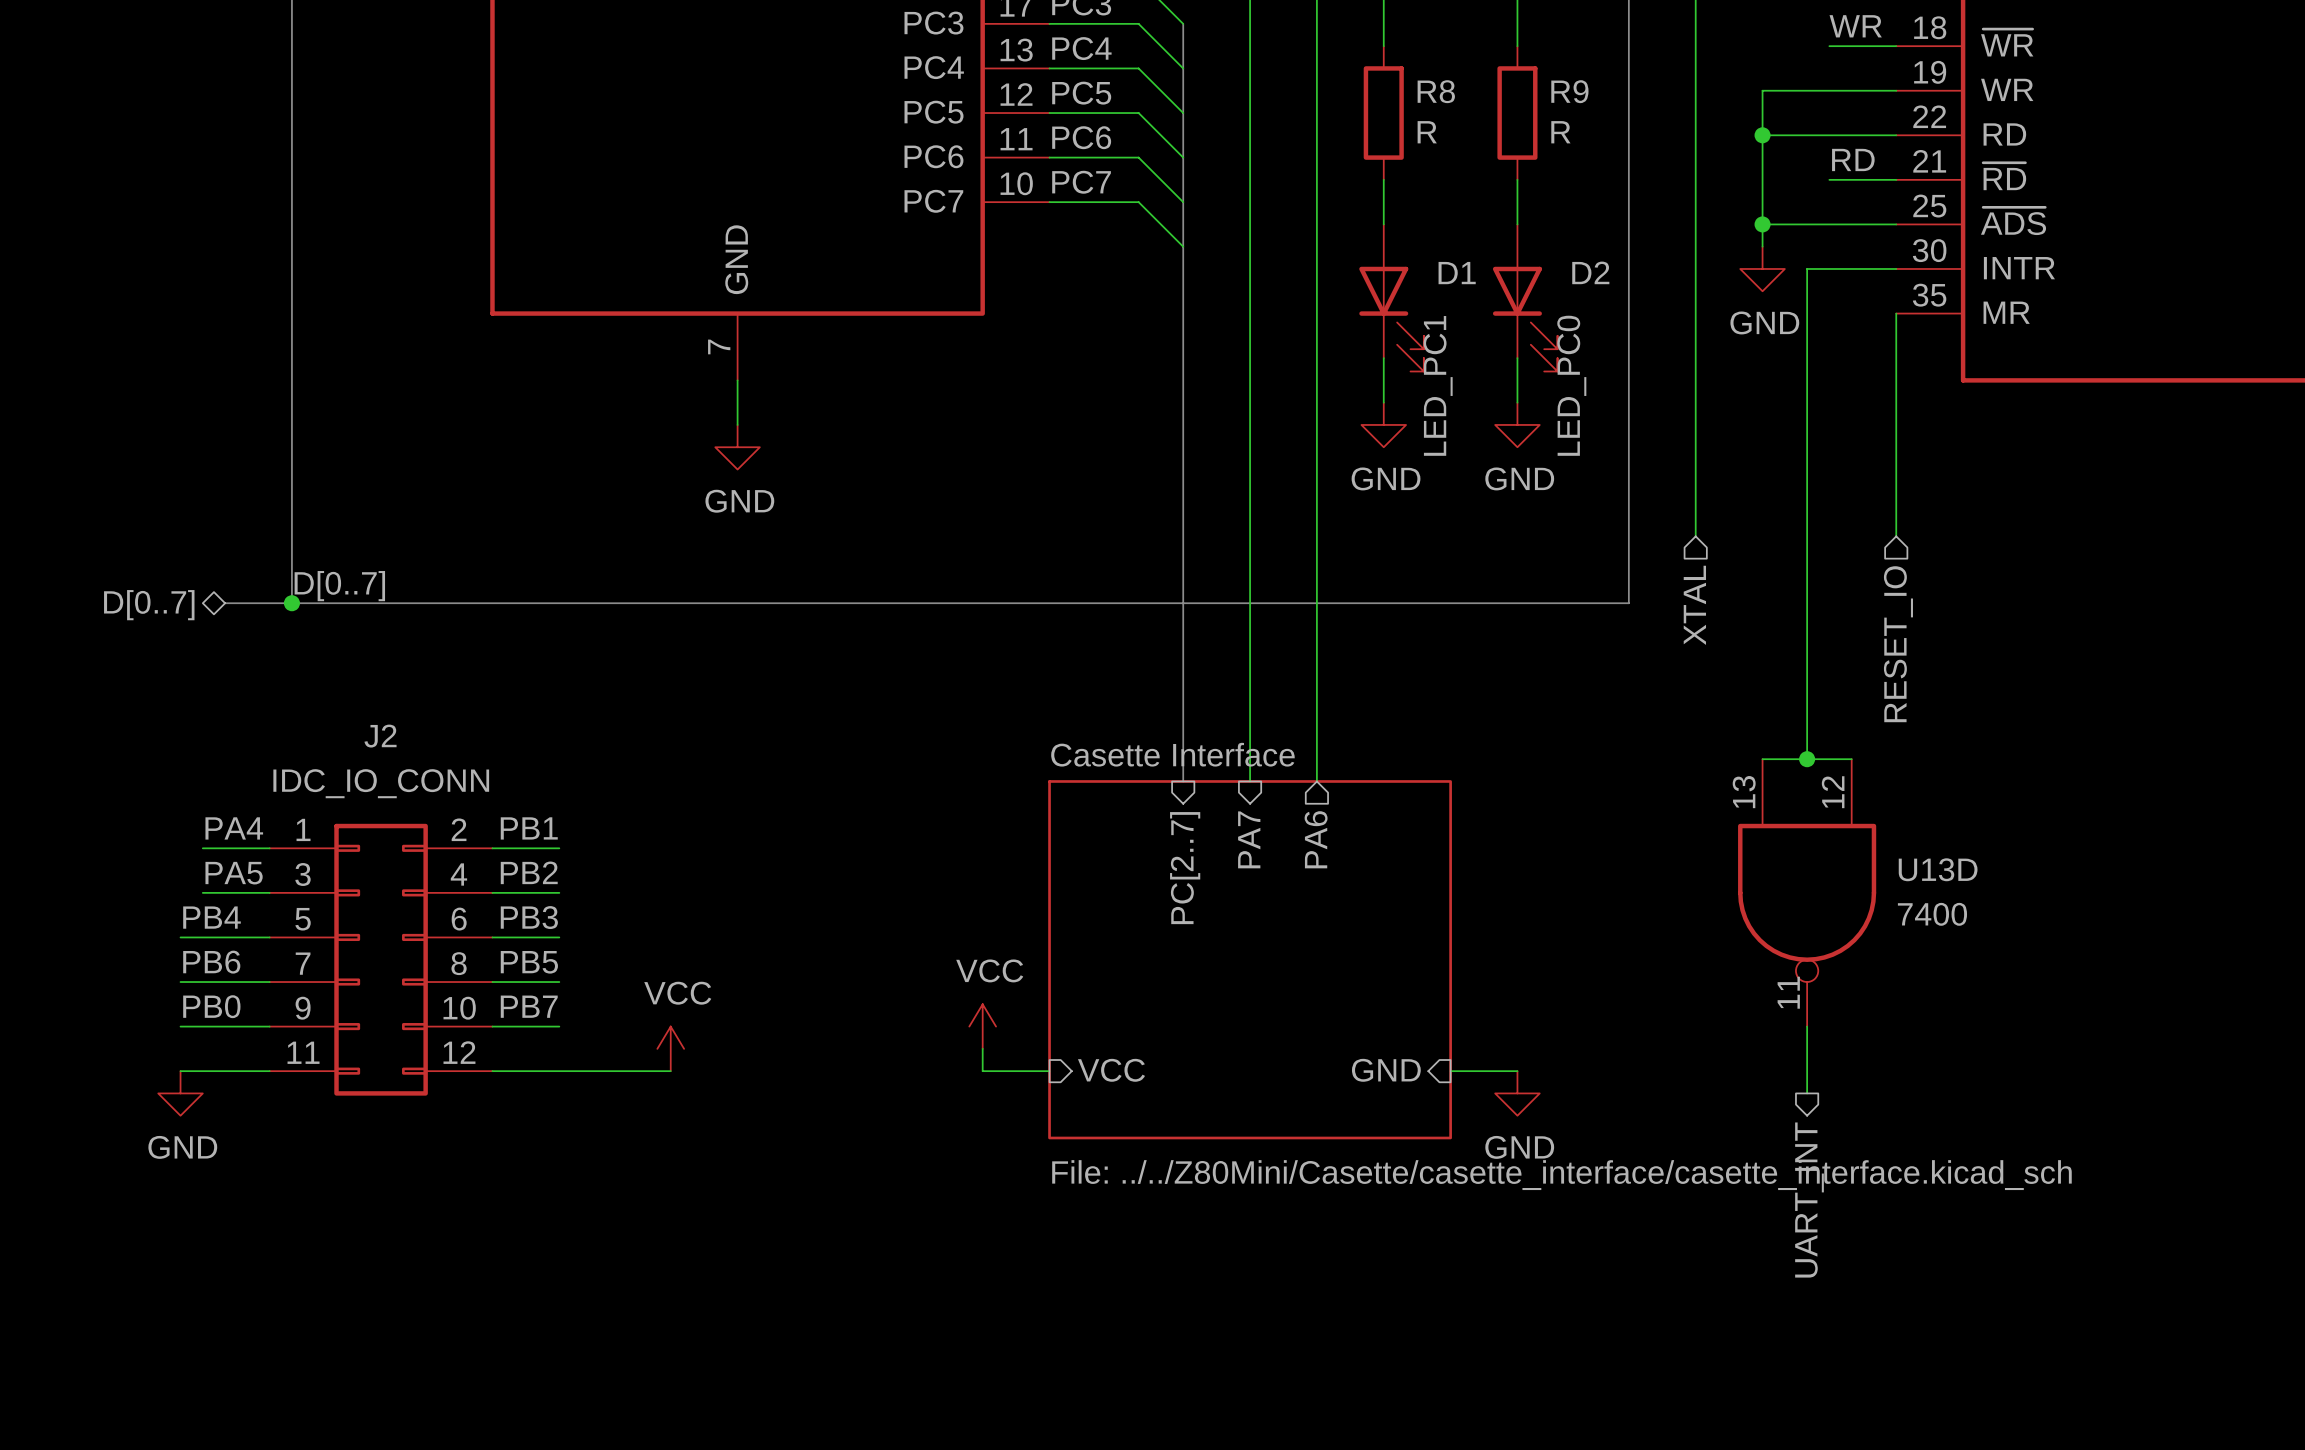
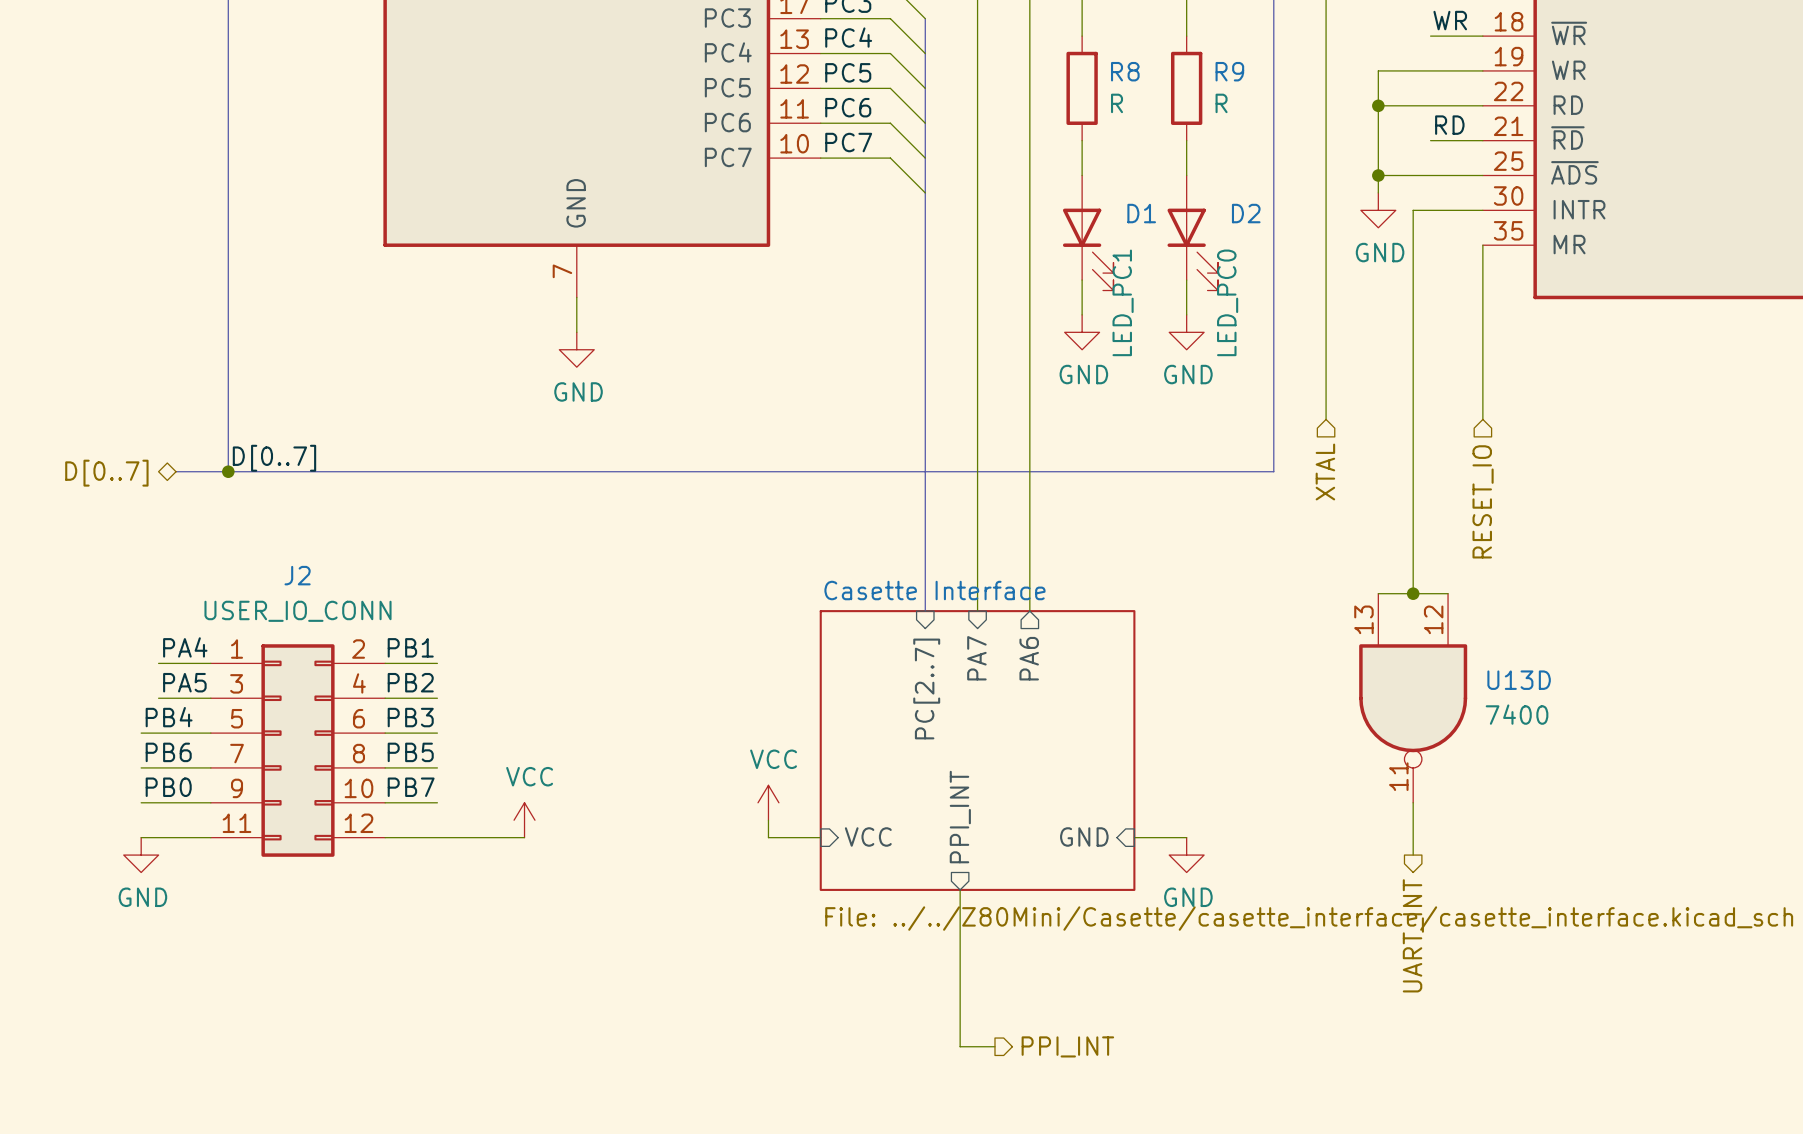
J2 value: IDC_IO_CONN (381, 783) -> USER_IO_CONN (298, 611)
sheet pin: none -> PPI_INT (960, 817)
wire: none -> (960, 889) (960, 1046) (994, 1046)
hierarchical label: none -> PPI_INT (1067, 1046)

